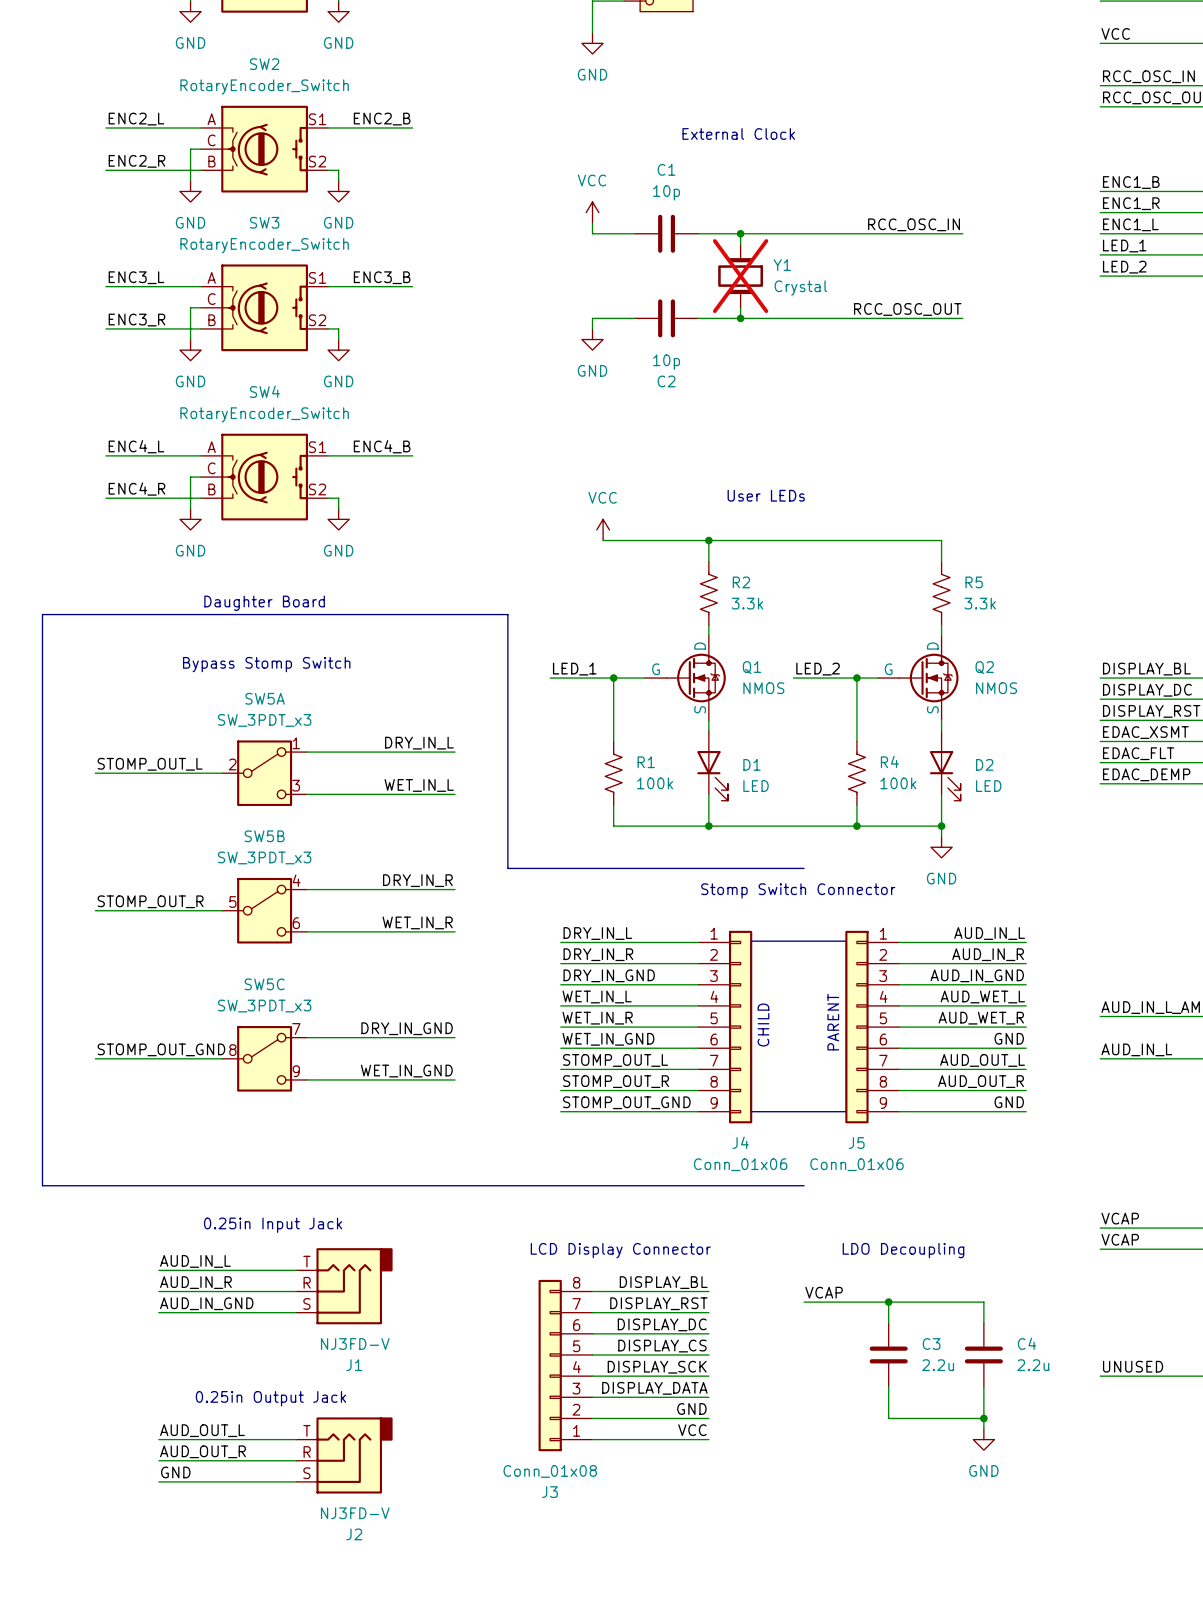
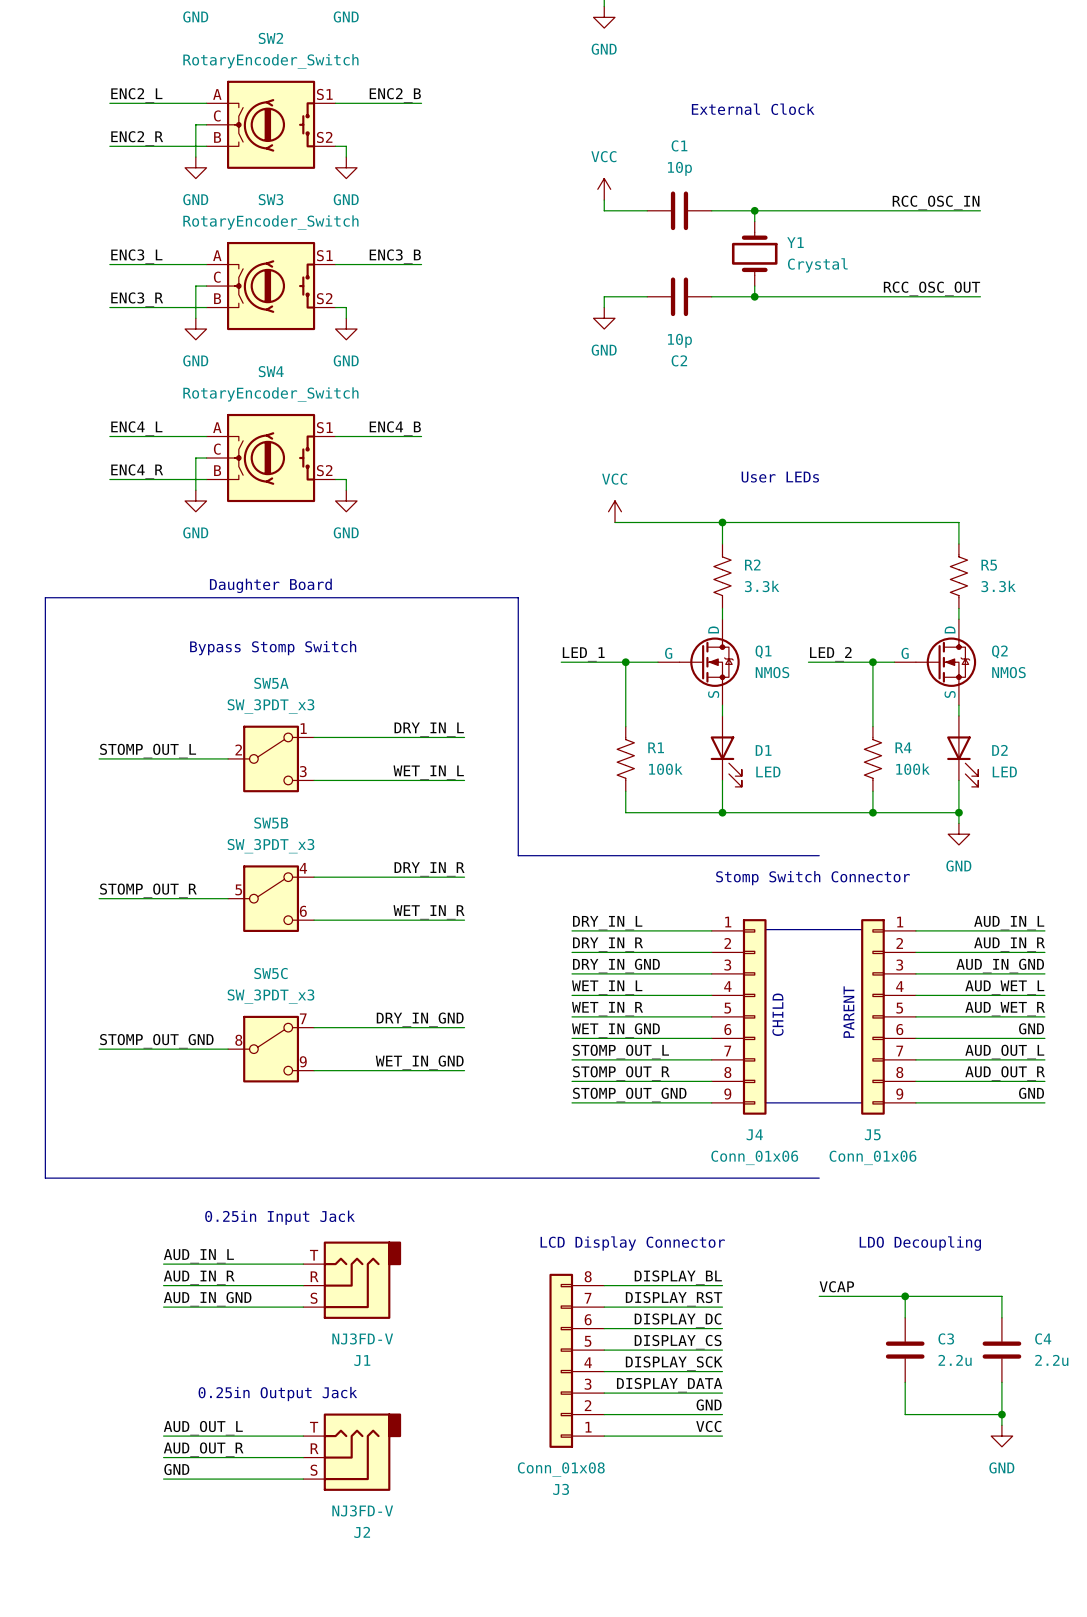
Y1 do-not-place cross: (740, 276) -> none

